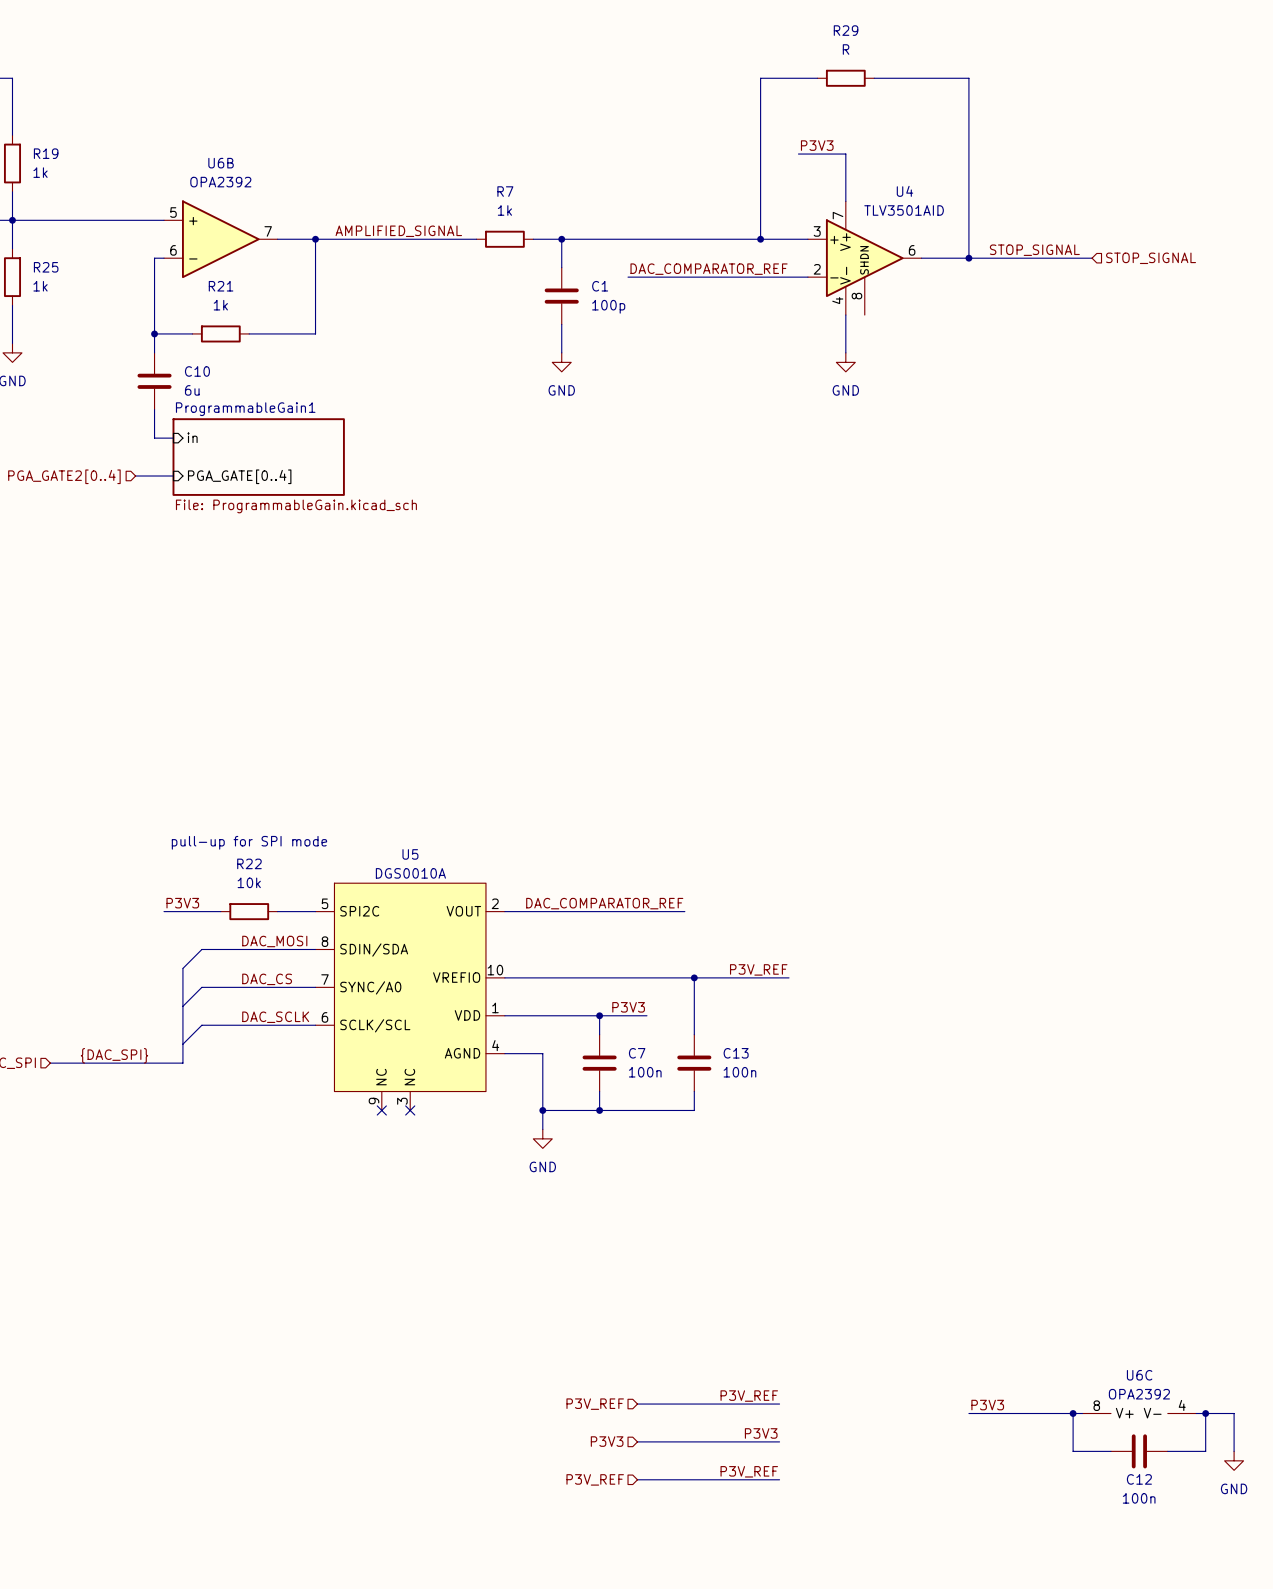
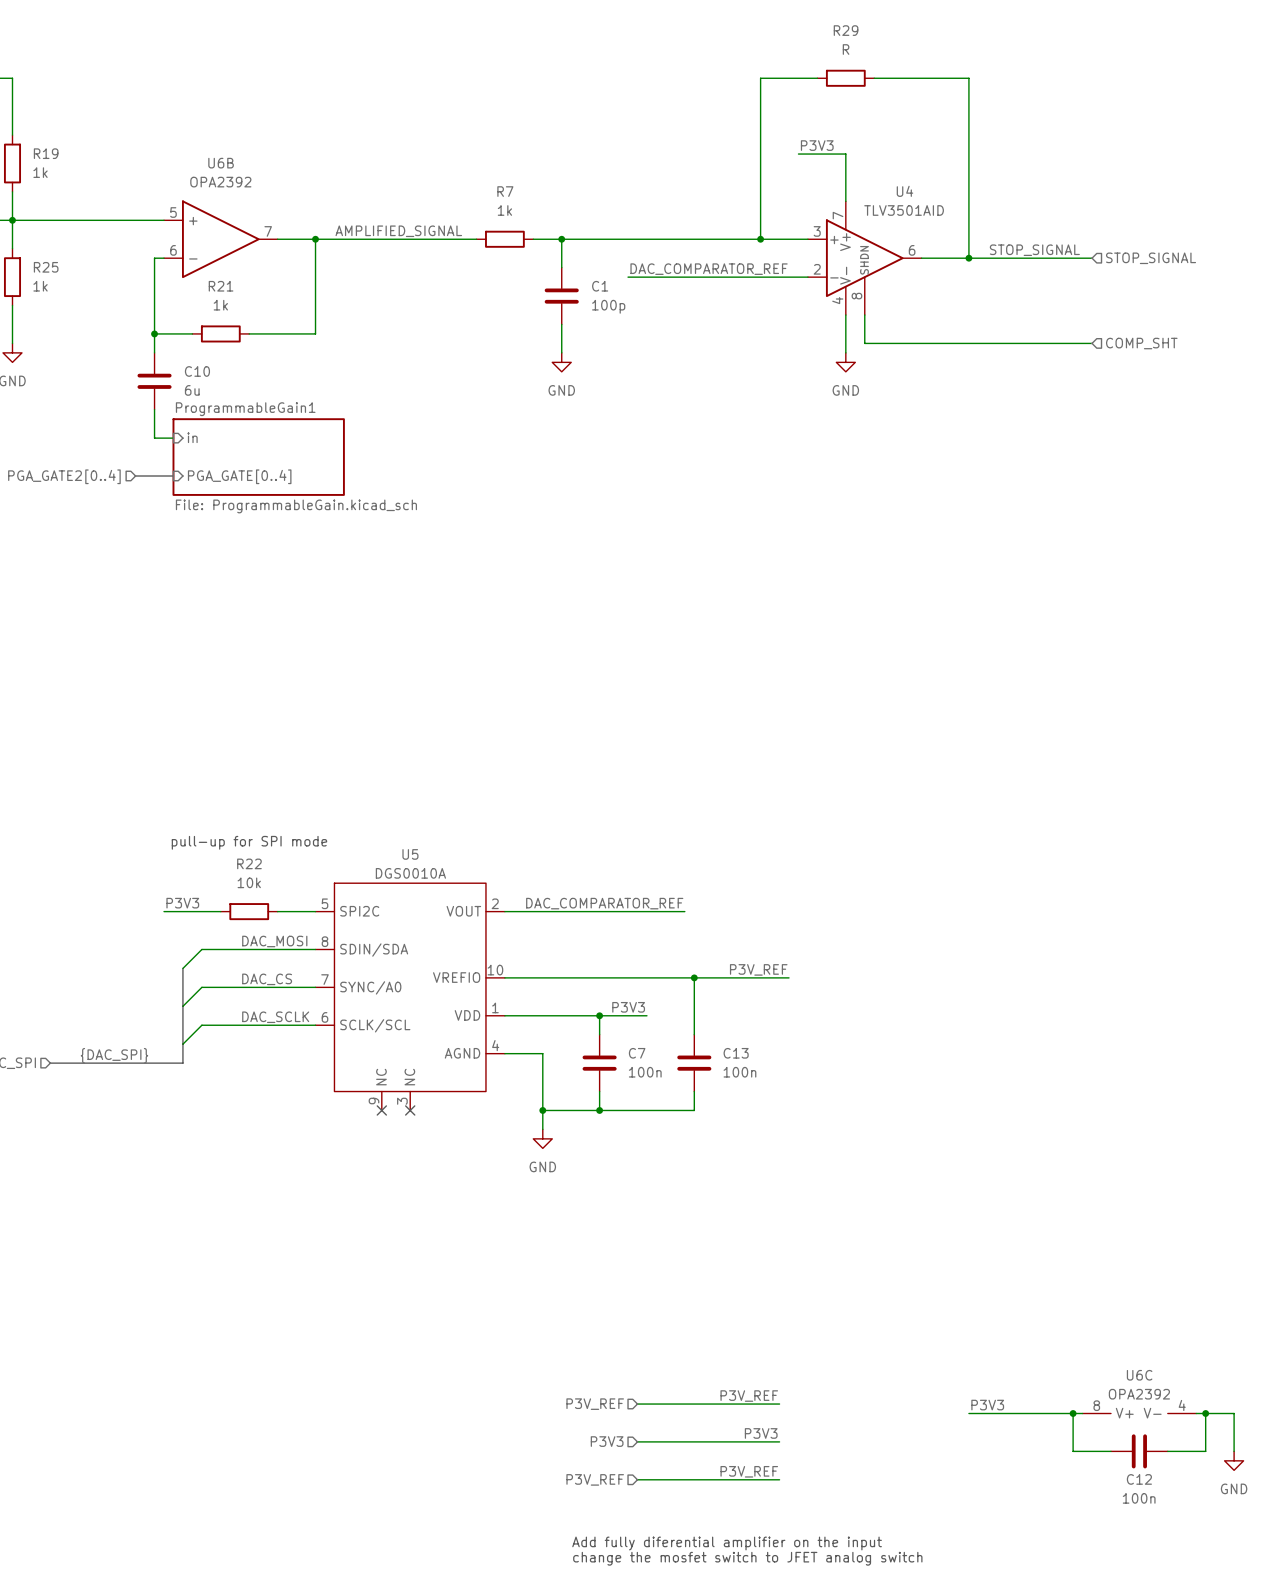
wire: none -> (864, 315) (864, 343) (1092, 343)
hierarchical label: none -> COMP_SHT (1141, 343)
text: none -> Add fully diferential amplifier on the input (727, 1543)
text: none -> change the mosfet switch to JFET analog switch (747, 1558)

